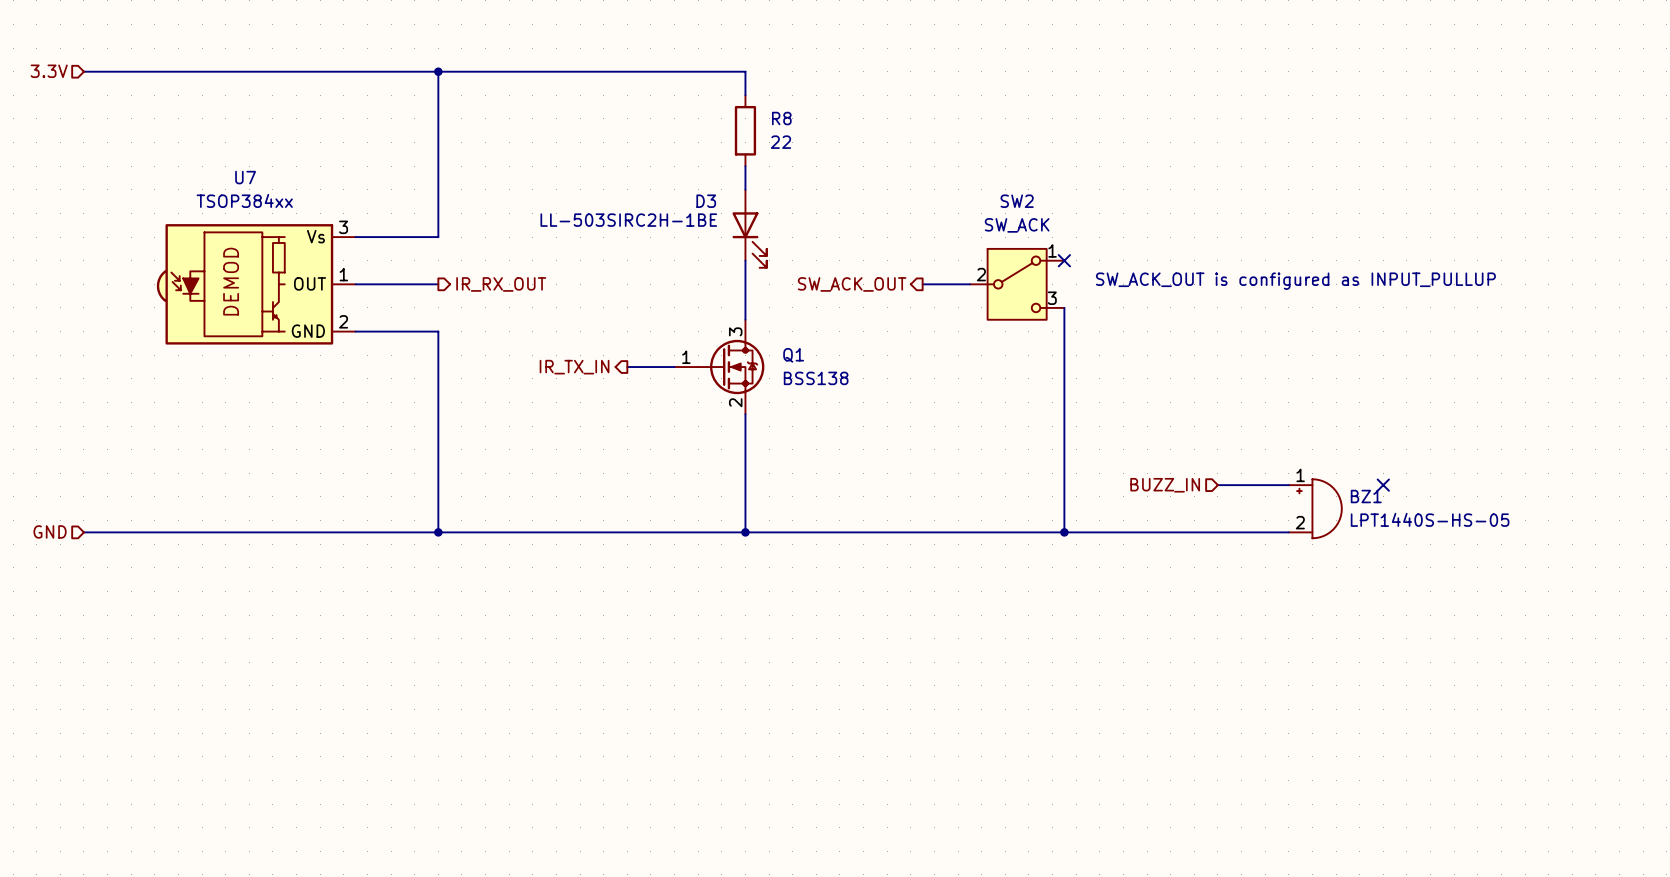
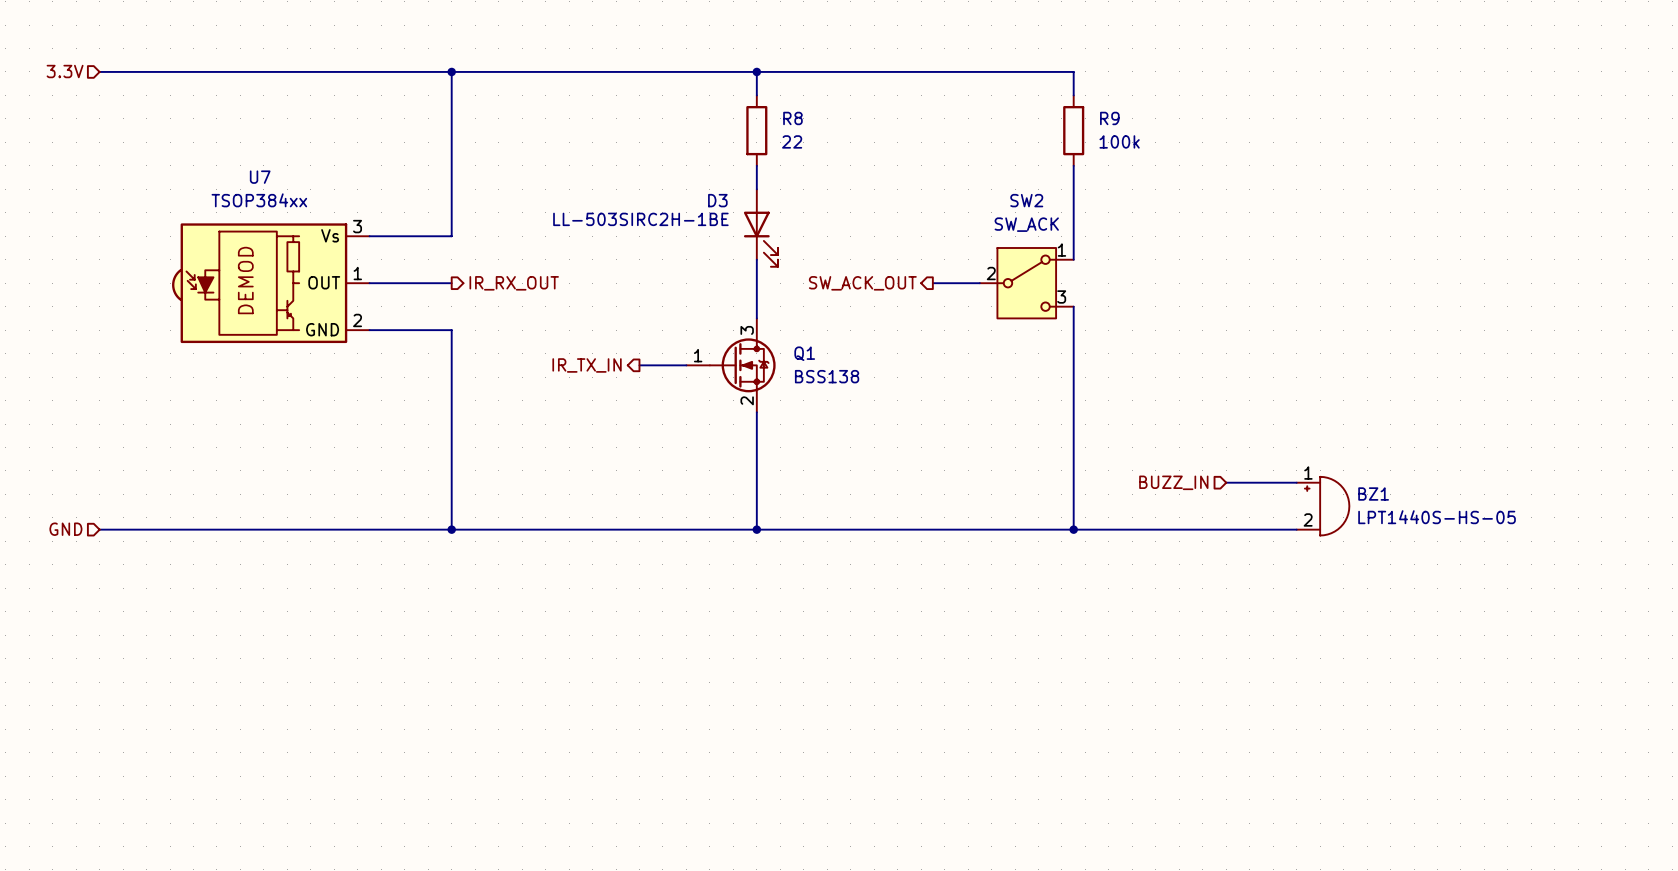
wire: none -> (756, 71) (1073, 71) (1073, 95)
junction: none -> (756, 71)
R9: none -> 100k (1073, 130)
wire: none -> (1073, 165) (1073, 259)
no-connect mark: (1064, 260) -> none
text: SW_ACK_OUT is configured as INPUT_PULLUP (1295, 281) -> none
no-connect mark: (1383, 485) -> none

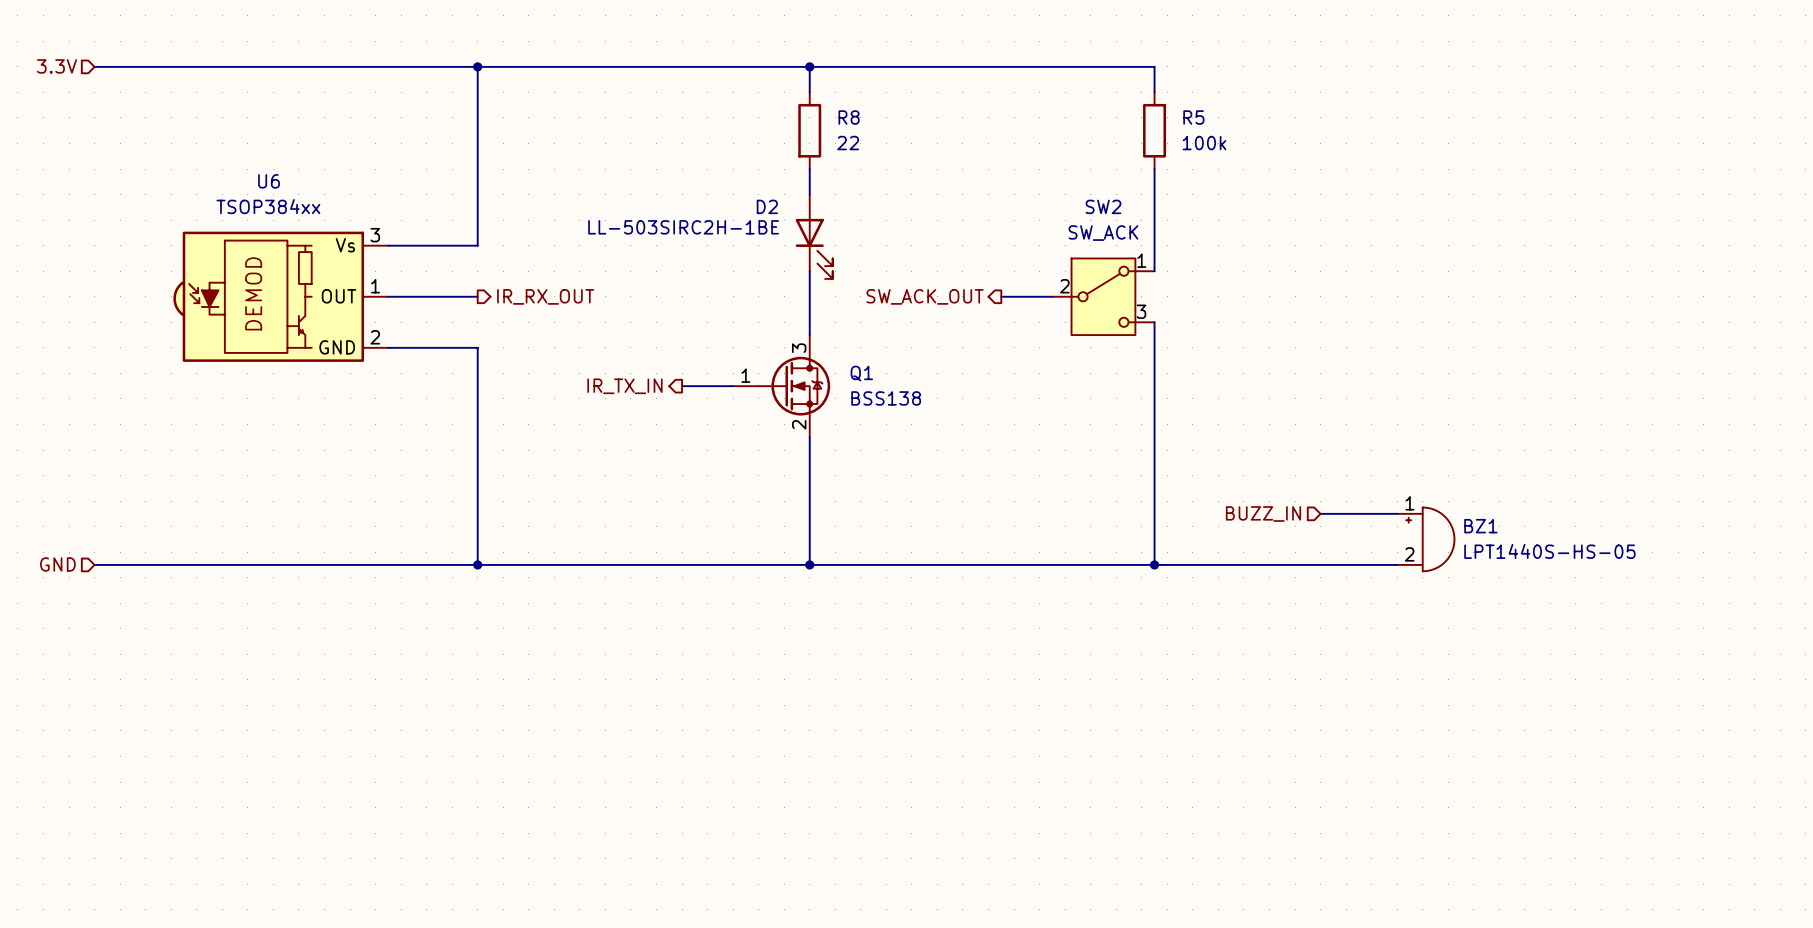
R9 name: R9 (1109, 118) -> R5 (1193, 117)
U7 name: U7 (260, 177) -> U6 (269, 181)
D3 name: D3 (717, 200) -> D2 (767, 206)

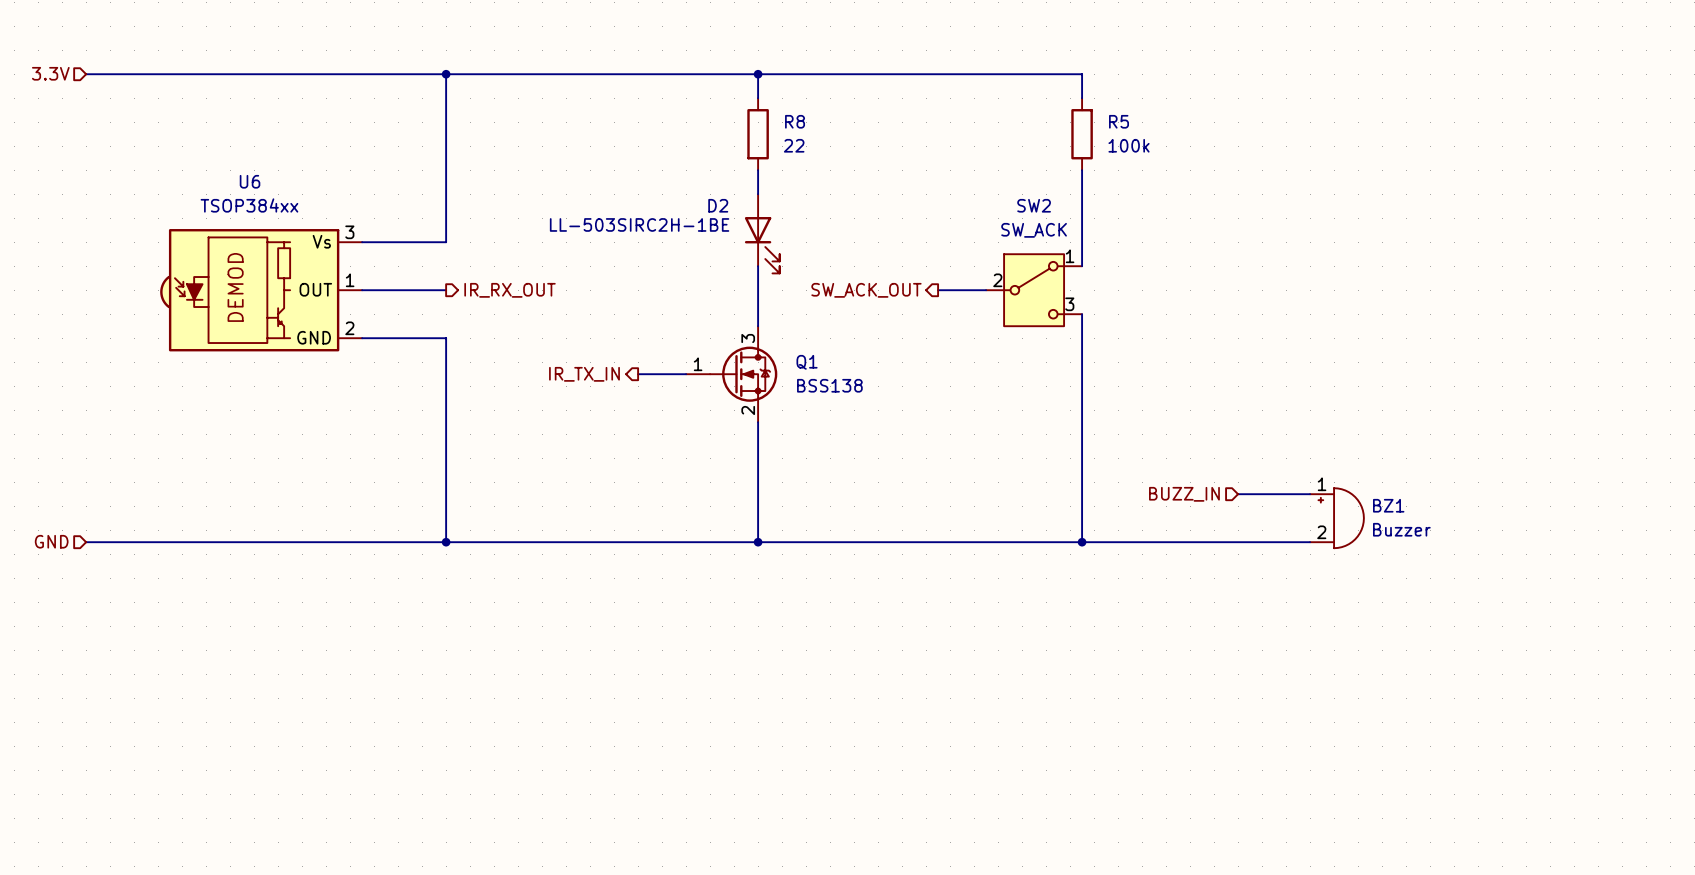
BZ1 value: LPT1440S-HS-05 (1549, 551) -> Buzzer (1401, 529)

